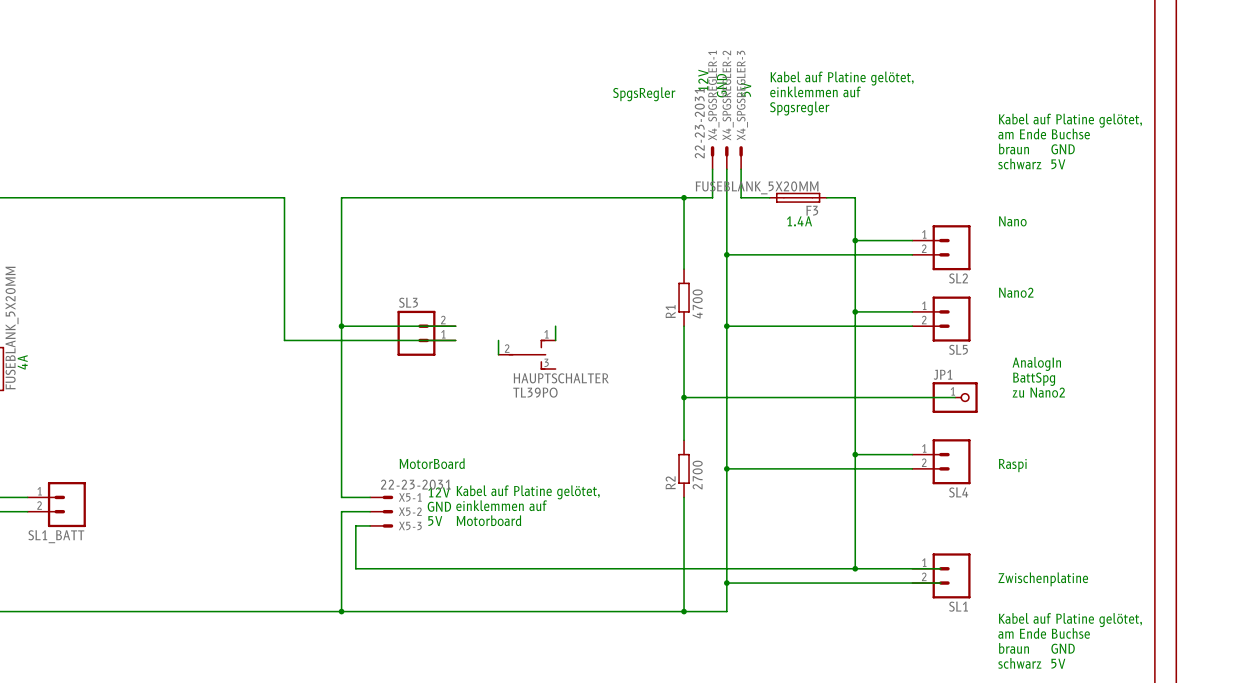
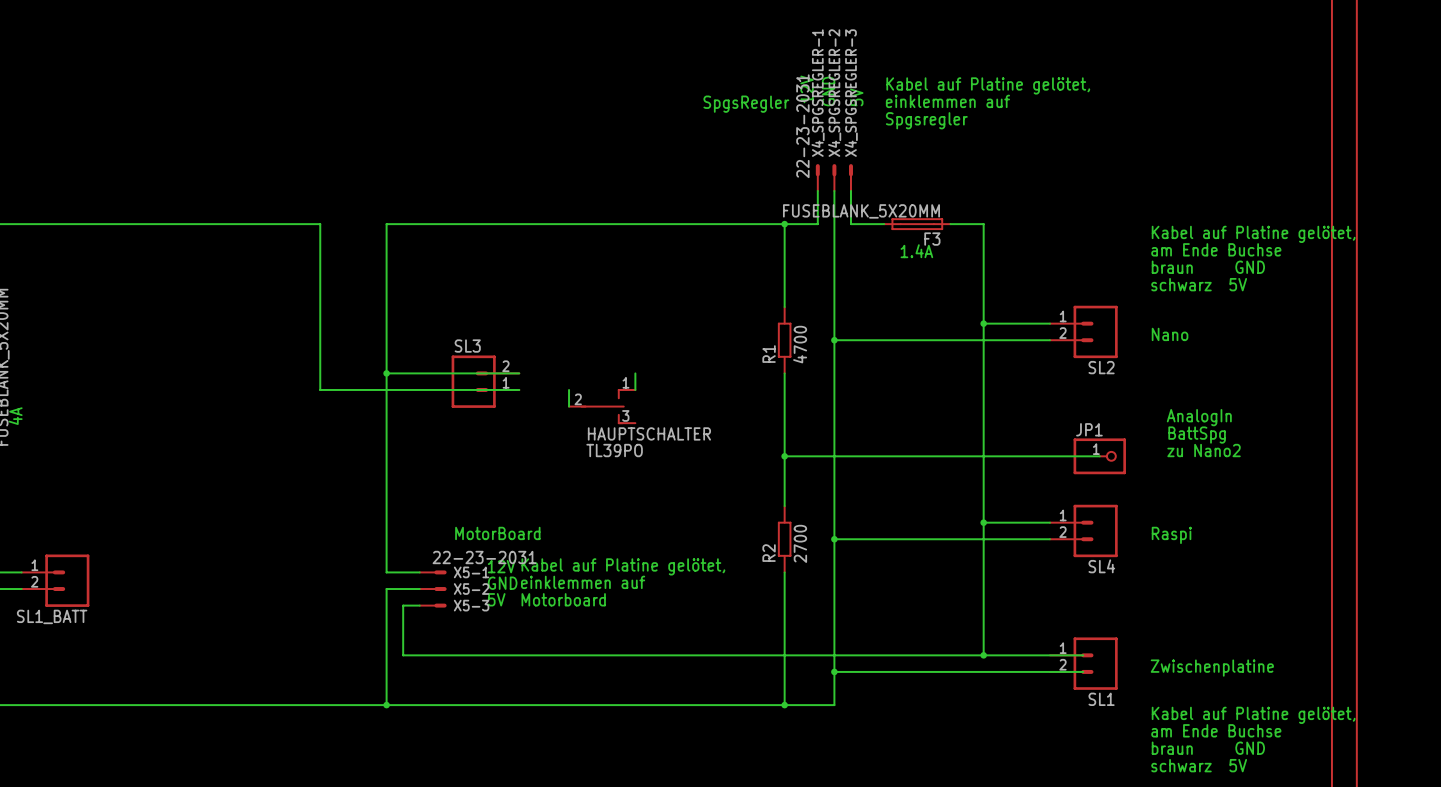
text position: Kabel auf Platine gelötet, (1070, 120) -> Kabel auf Platine gelötet, (1253, 234)
text position: am Ende Buchse (1044, 134) -> am Ende Buchse (1216, 249)
text position: braun GND (1036, 148) -> braun GND (1208, 267)
text position: schwarz 5V (1031, 163) -> schwarz 5V (1199, 284)
text: Nano (1012, 221) -> none
wire: (855, 240) (912, 240) -> none
junction: (855, 240) -> none
SL2 position: (941, 247) -> (1083, 331)
wire: (726, 254) (912, 254) -> none
junction: (726, 254) -> none
junction: none -> (983, 323)
text: Nano2 (1016, 292) -> Nano (1170, 334)
junction: none -> (834, 340)
wire: (855, 311) (912, 311) -> (983, 323) (1050, 323)
junction: (855, 311) -> none
SL5: (941, 319) -> none
wire: (726, 326) (912, 326) -> (834, 340) (1050, 340)
junction: (726, 326) -> none

